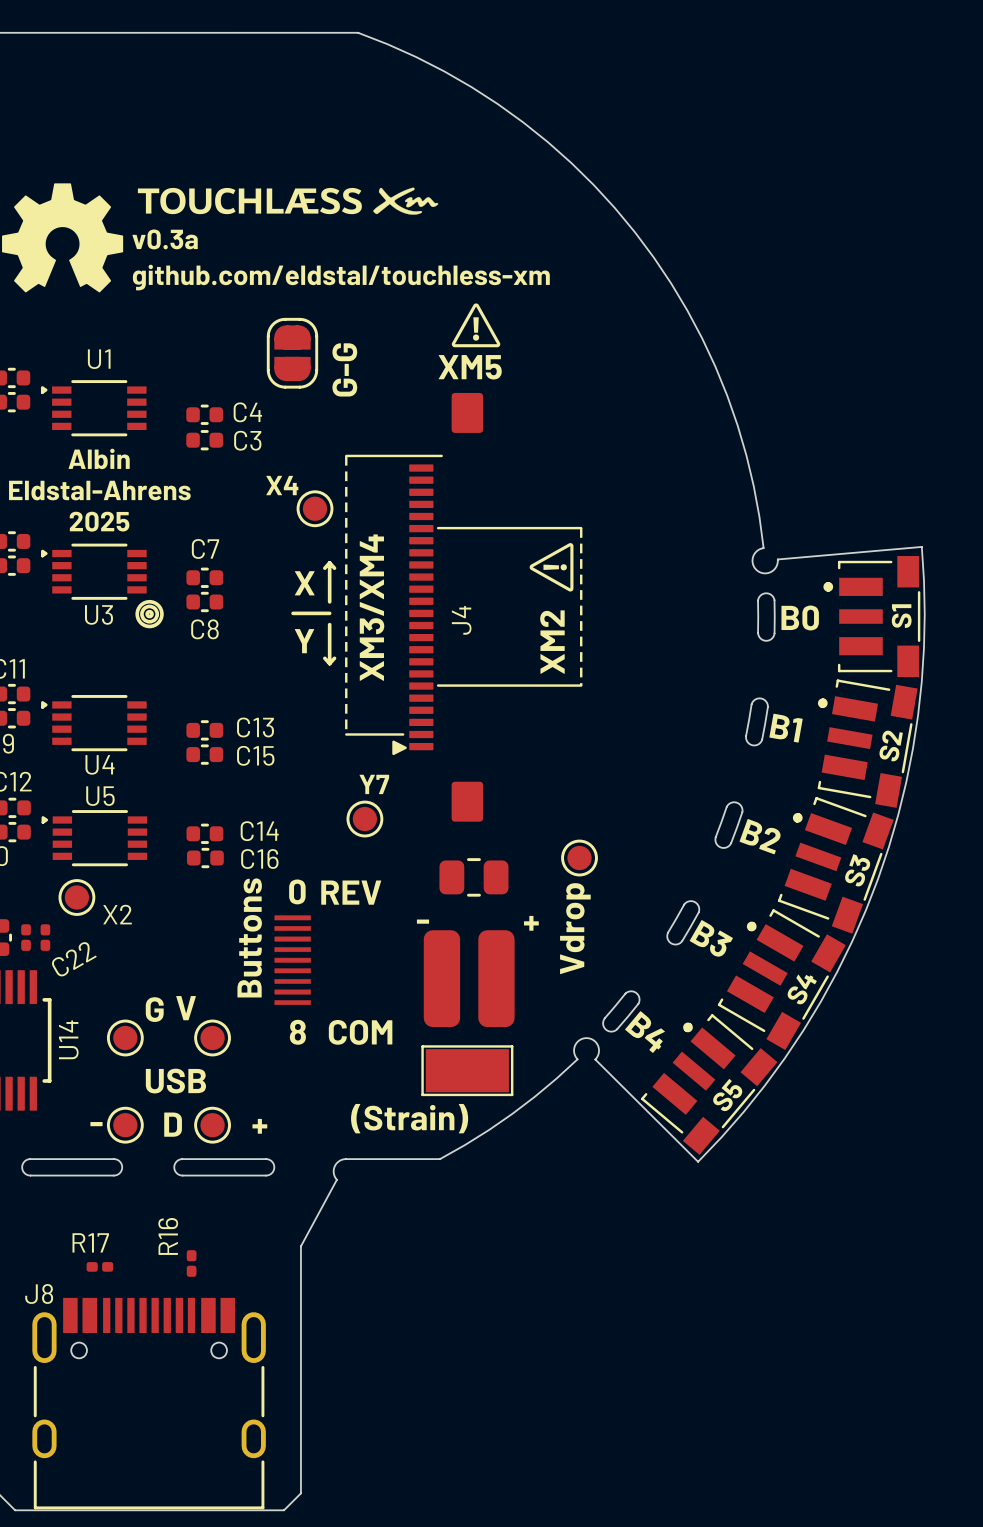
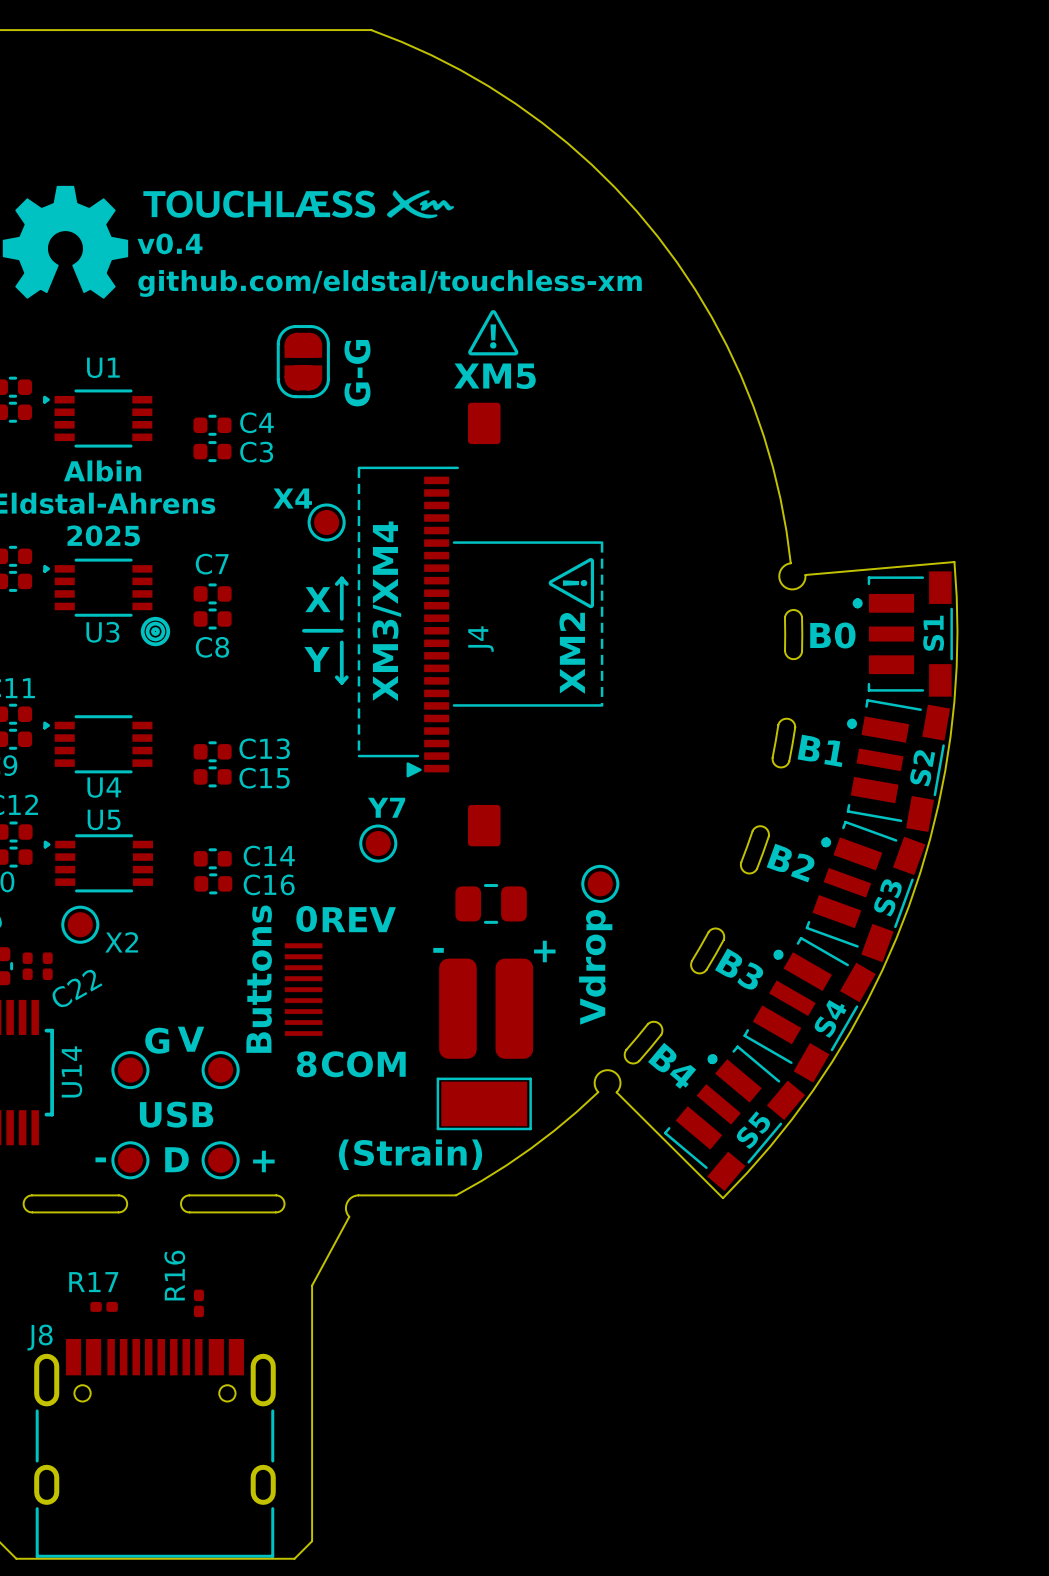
text: v0.3a (165, 239) -> v0.4 (170, 243)

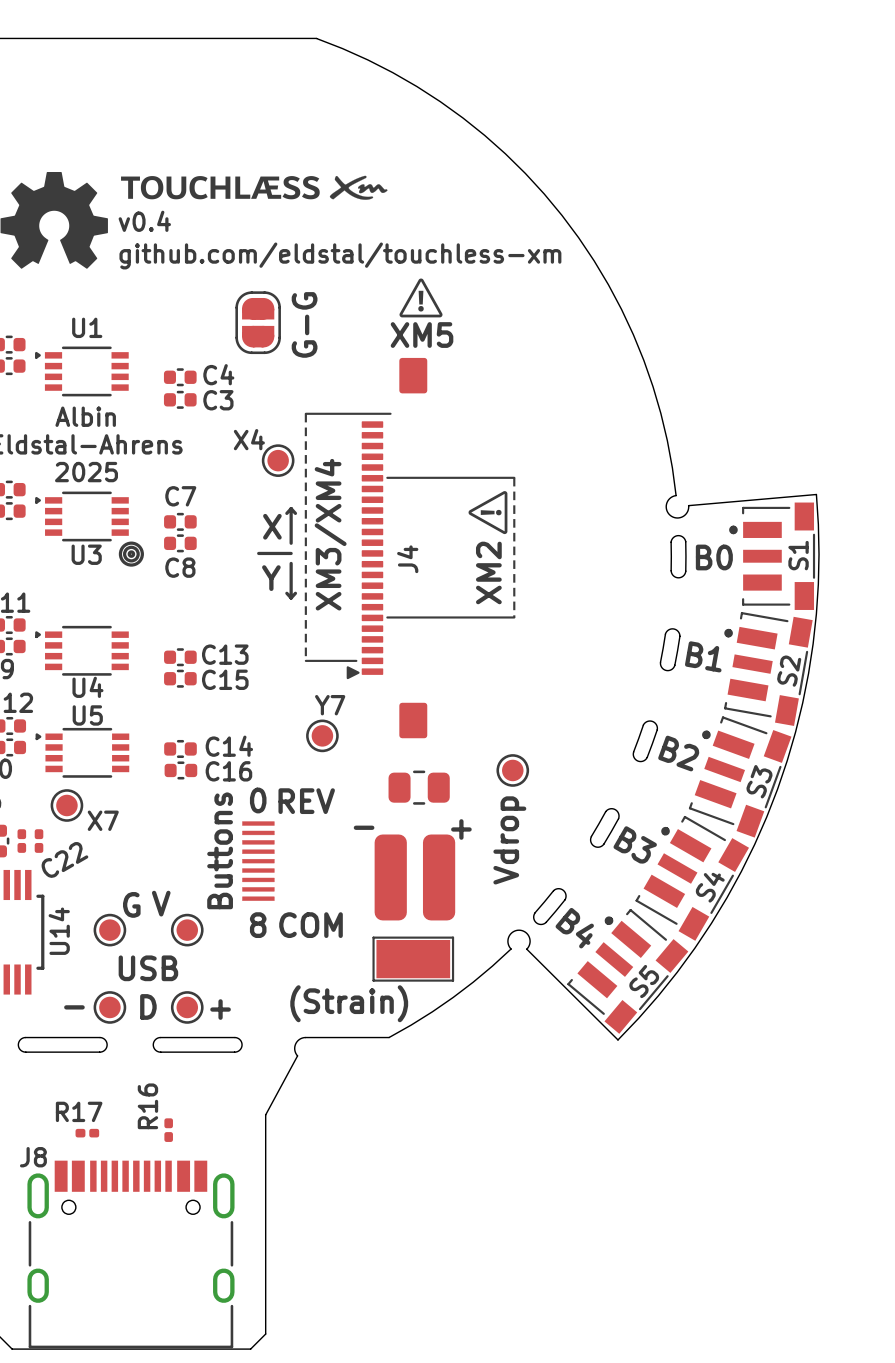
X2 name: X2 (121, 942) -> X7 (103, 820)

